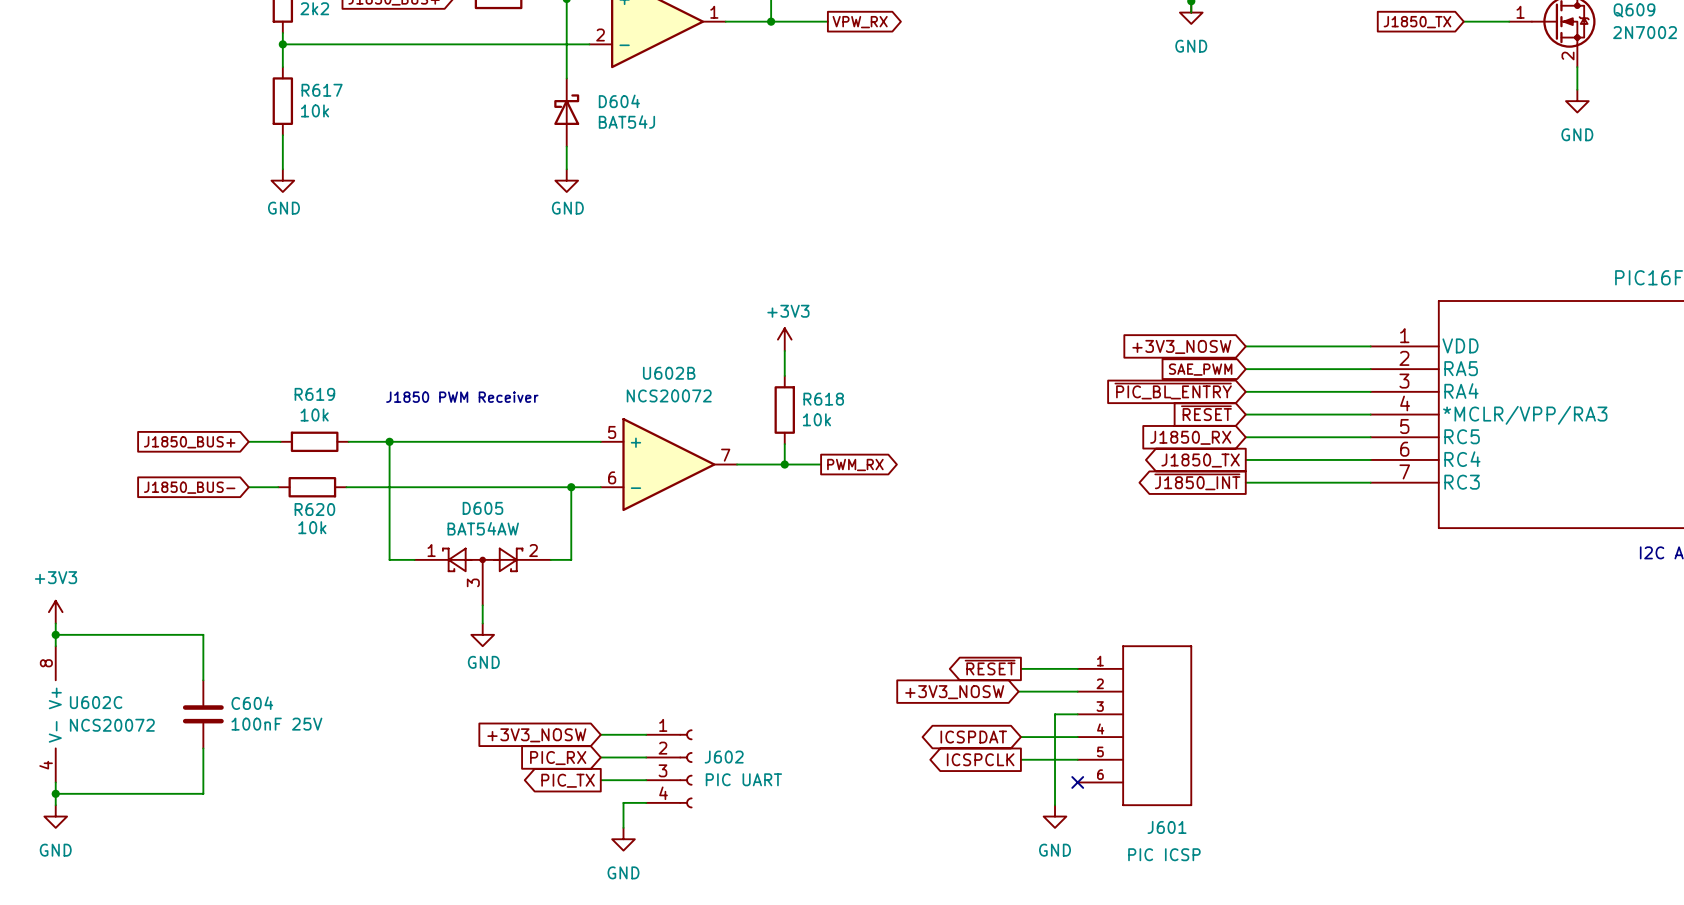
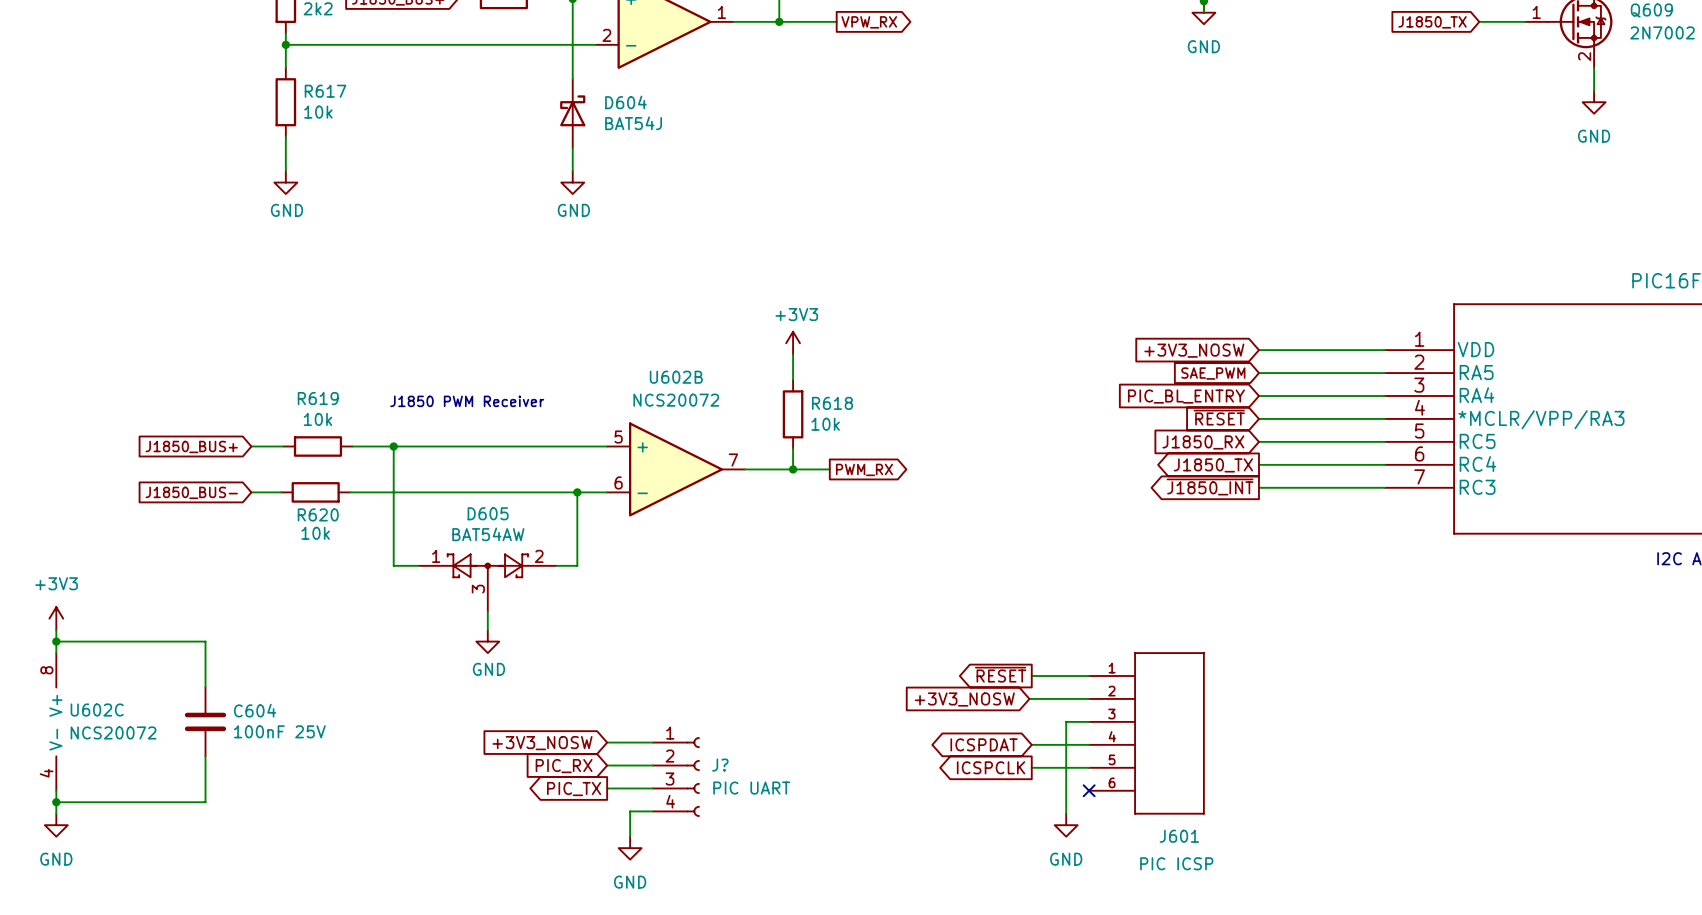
global label: ~{PIC_BL_ENTRY} (1173, 391) -> PIC_BL_ENTRY (1186, 396)
J602 name: J602 (724, 757) -> J? (720, 765)

